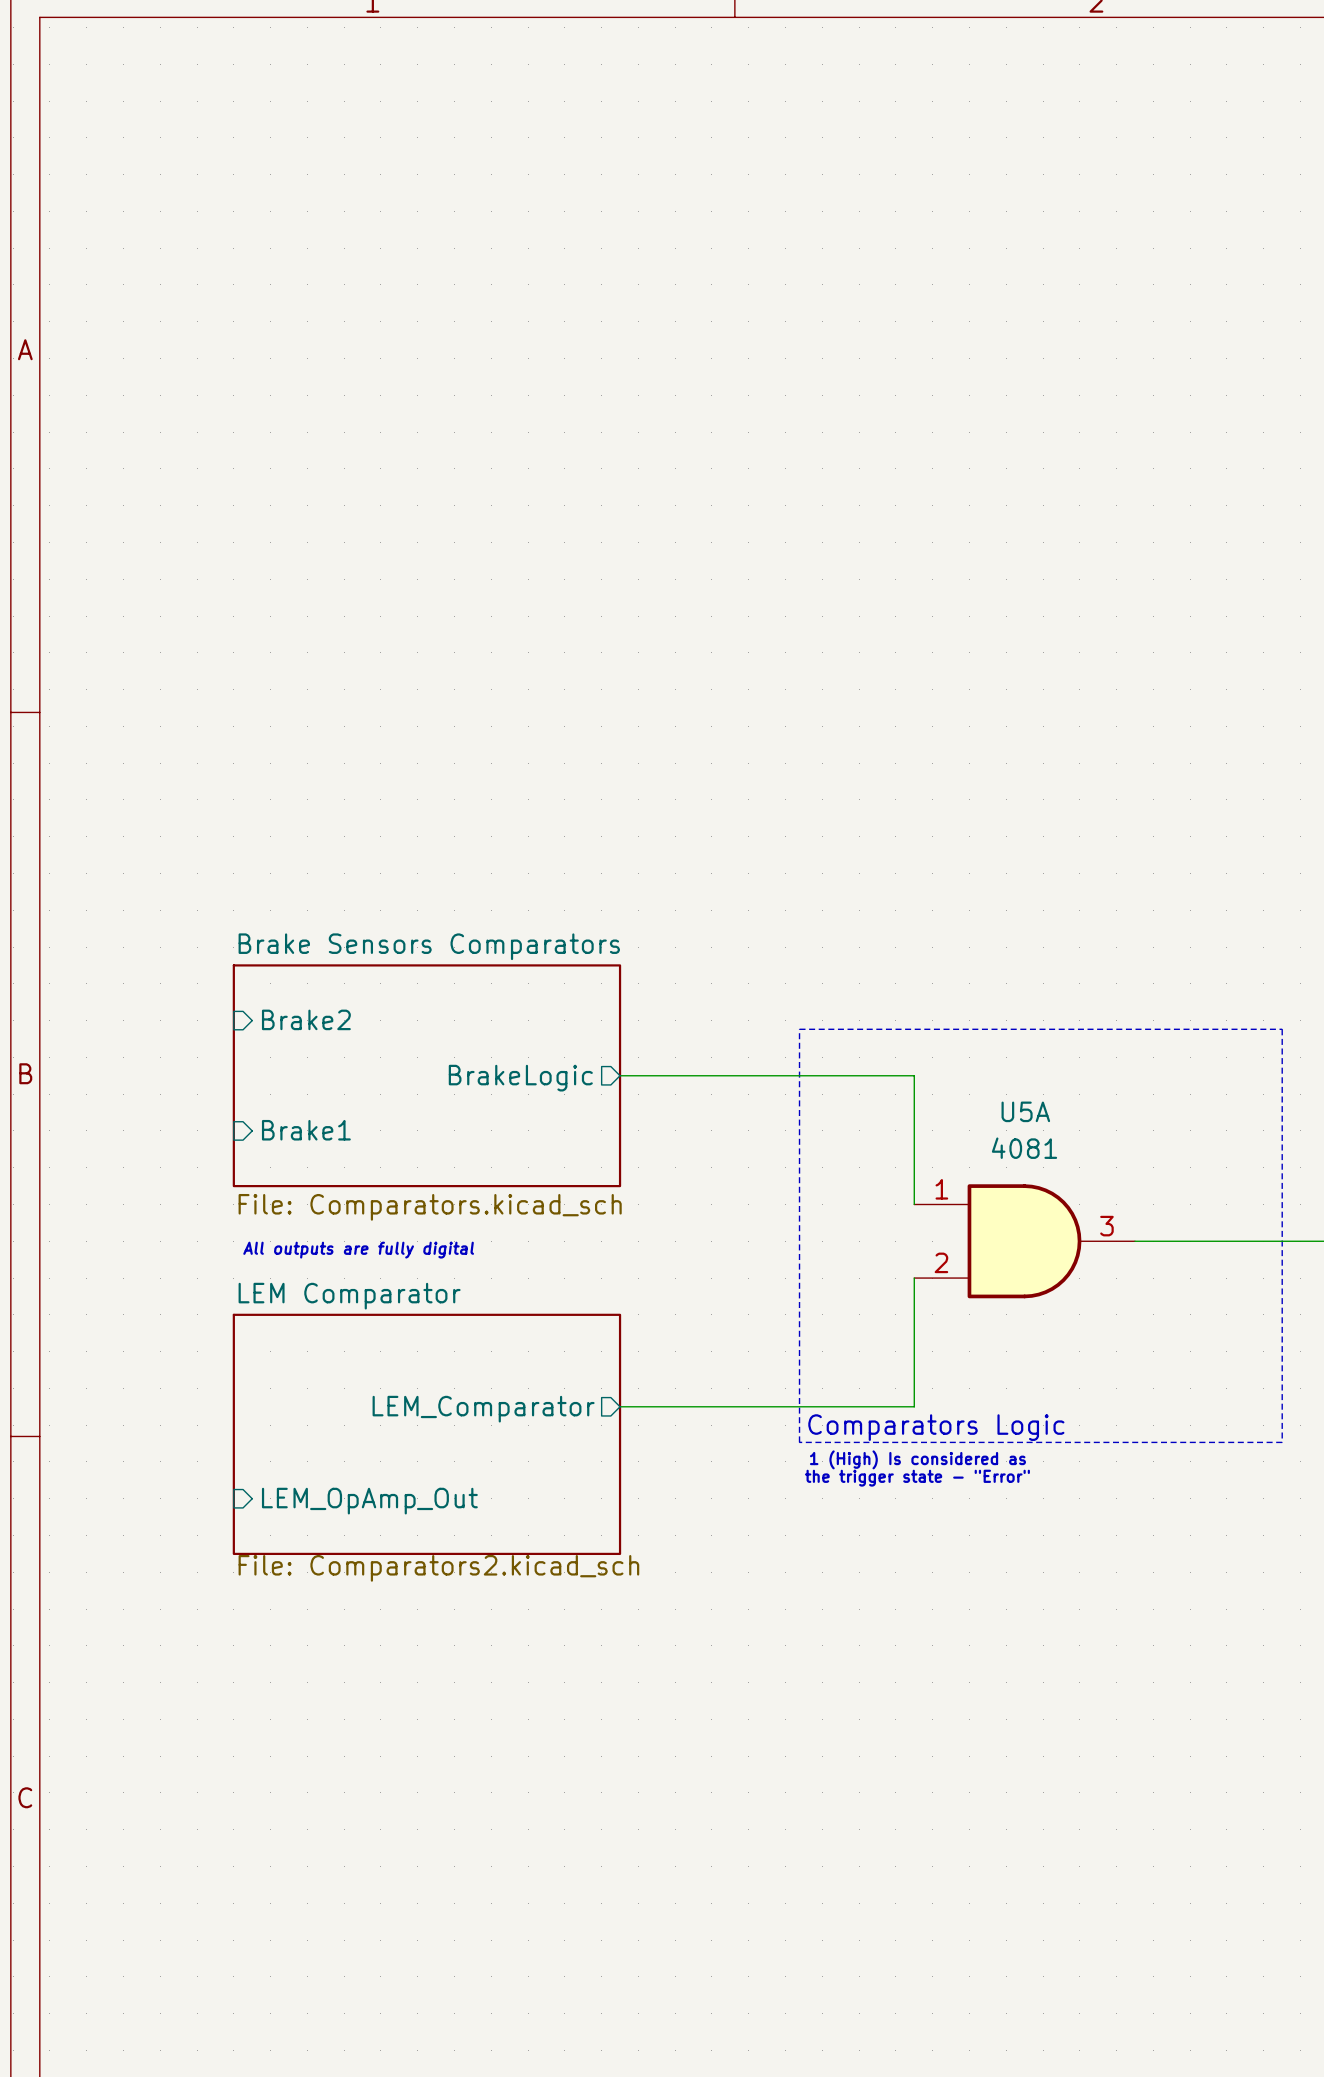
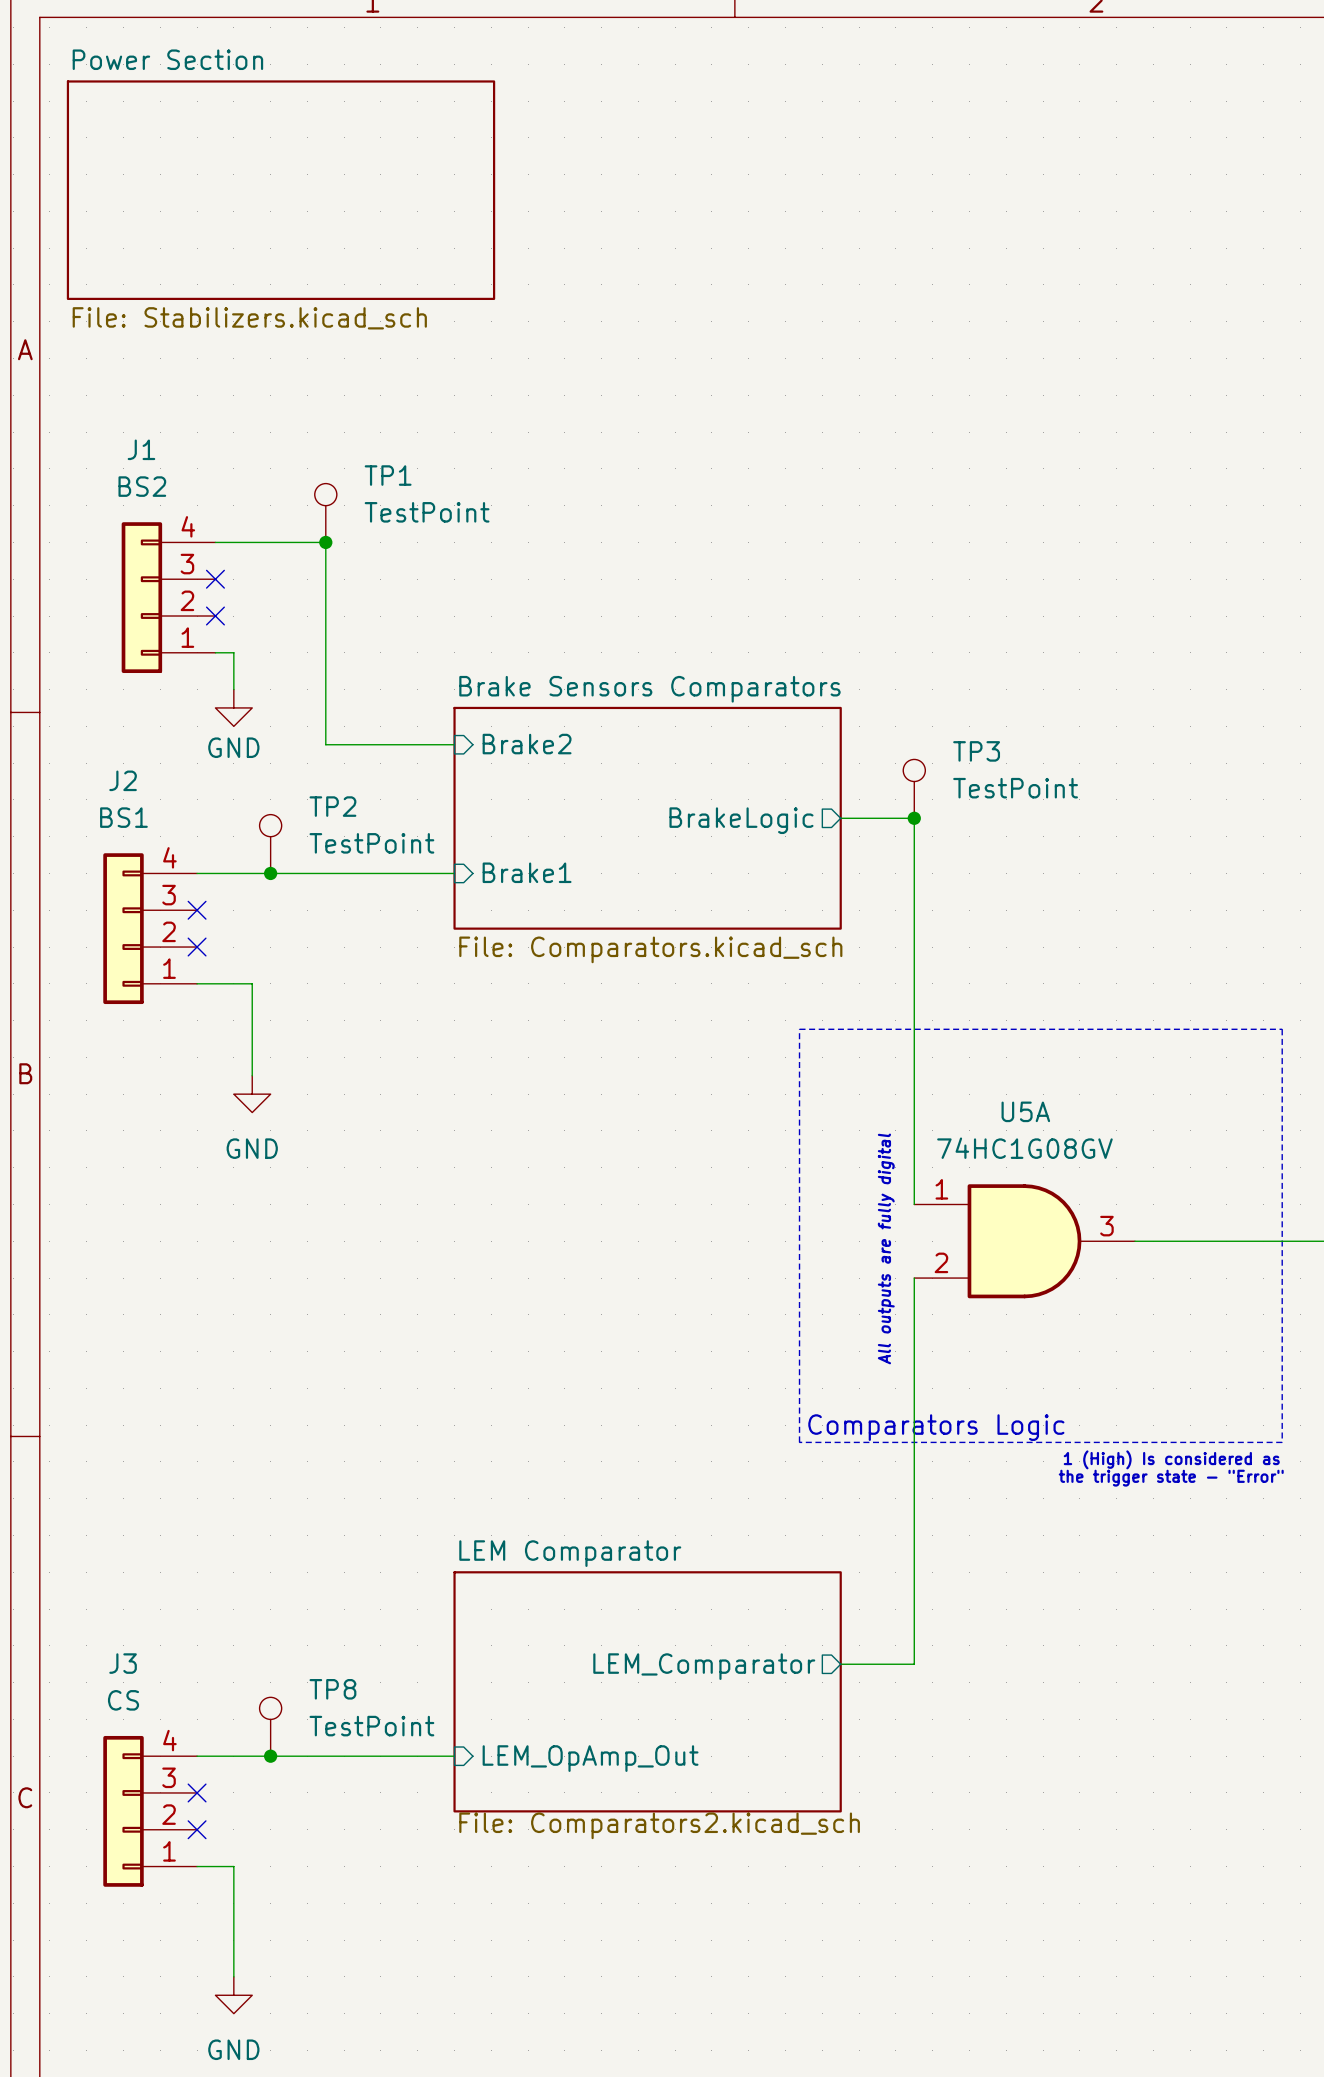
sheet Power Section: none -> File: Stabilizers.kicad_sch (281, 190)
TP1: none -> TestPoint (325, 513)
wire: none -> (215, 542) (325, 542) (325, 744) (454, 744)
junction: none -> (325, 542)
no-connect mark: none -> (215, 579)
J1: none -> BS2 (168, 597)
no-connect mark: none -> (215, 616)
wire: none -> (215, 652) (233, 652) (233, 689)
power symbol: none -> GND (233, 707)
TP3: none -> TestPoint (914, 788)
junction: none -> (914, 818)
TP2: none -> TestPoint (270, 844)
wire: none -> (197, 873) (454, 873)
junction: none -> (270, 873)
no-connect mark: none -> (197, 910)
J2: none -> BS1 (150, 928)
no-connect mark: none -> (197, 947)
wire: none -> (197, 983) (252, 983) (252, 1075)
sheet pin position: Brake2 (306, 1019) -> Brake2 (527, 744)
sheet Brake Sensors Comparators position: (426, 1075) -> (647, 818)
wire: (620, 1075) (914, 1075) -> (840, 818) (914, 818) (914, 1075)
sheet pin position: BrakeLogic (520, 1078) -> BrakeLogic (741, 820)
power symbol: none -> GND (252, 1094)
sheet pin position: Brake1 (306, 1130) -> Brake1 (527, 872)
U5A value: 4081 (1024, 1148) -> 74HC1G08GV (1024, 1148)
text: none -> All outputs are fully digital (886, 1248)
text: All outputs are fully digital (358, 1250) -> none
wire: (620, 1406) (914, 1406) -> (840, 1664) (914, 1664) (914, 1406)
sheet pin position: LEM_Comparator (483, 1409) -> LEM_Comparator (704, 1666)
sheet LEM Comparator position: (426, 1434) -> (647, 1691)
text position: 1 (High) Is considered as (917, 1459) -> 1 (High) Is considered as (1171, 1459)
text position: the trigger state - "Error" (917, 1478) -> the trigger state - "Error" (1171, 1478)
sheet pin position: LEM_OpAmp_Out (369, 1501) -> LEM_OpAmp_Out (590, 1758)
TP8: none -> TestPoint (270, 1726)
wire: none -> (197, 1756) (454, 1756)
junction: none -> (270, 1756)
no-connect mark: none -> (197, 1792)
J3: none -> CS (150, 1811)
no-connect mark: none -> (197, 1829)
wire: none -> (197, 1866) (233, 1866) (233, 1976)
power symbol: none -> GND (233, 1995)

